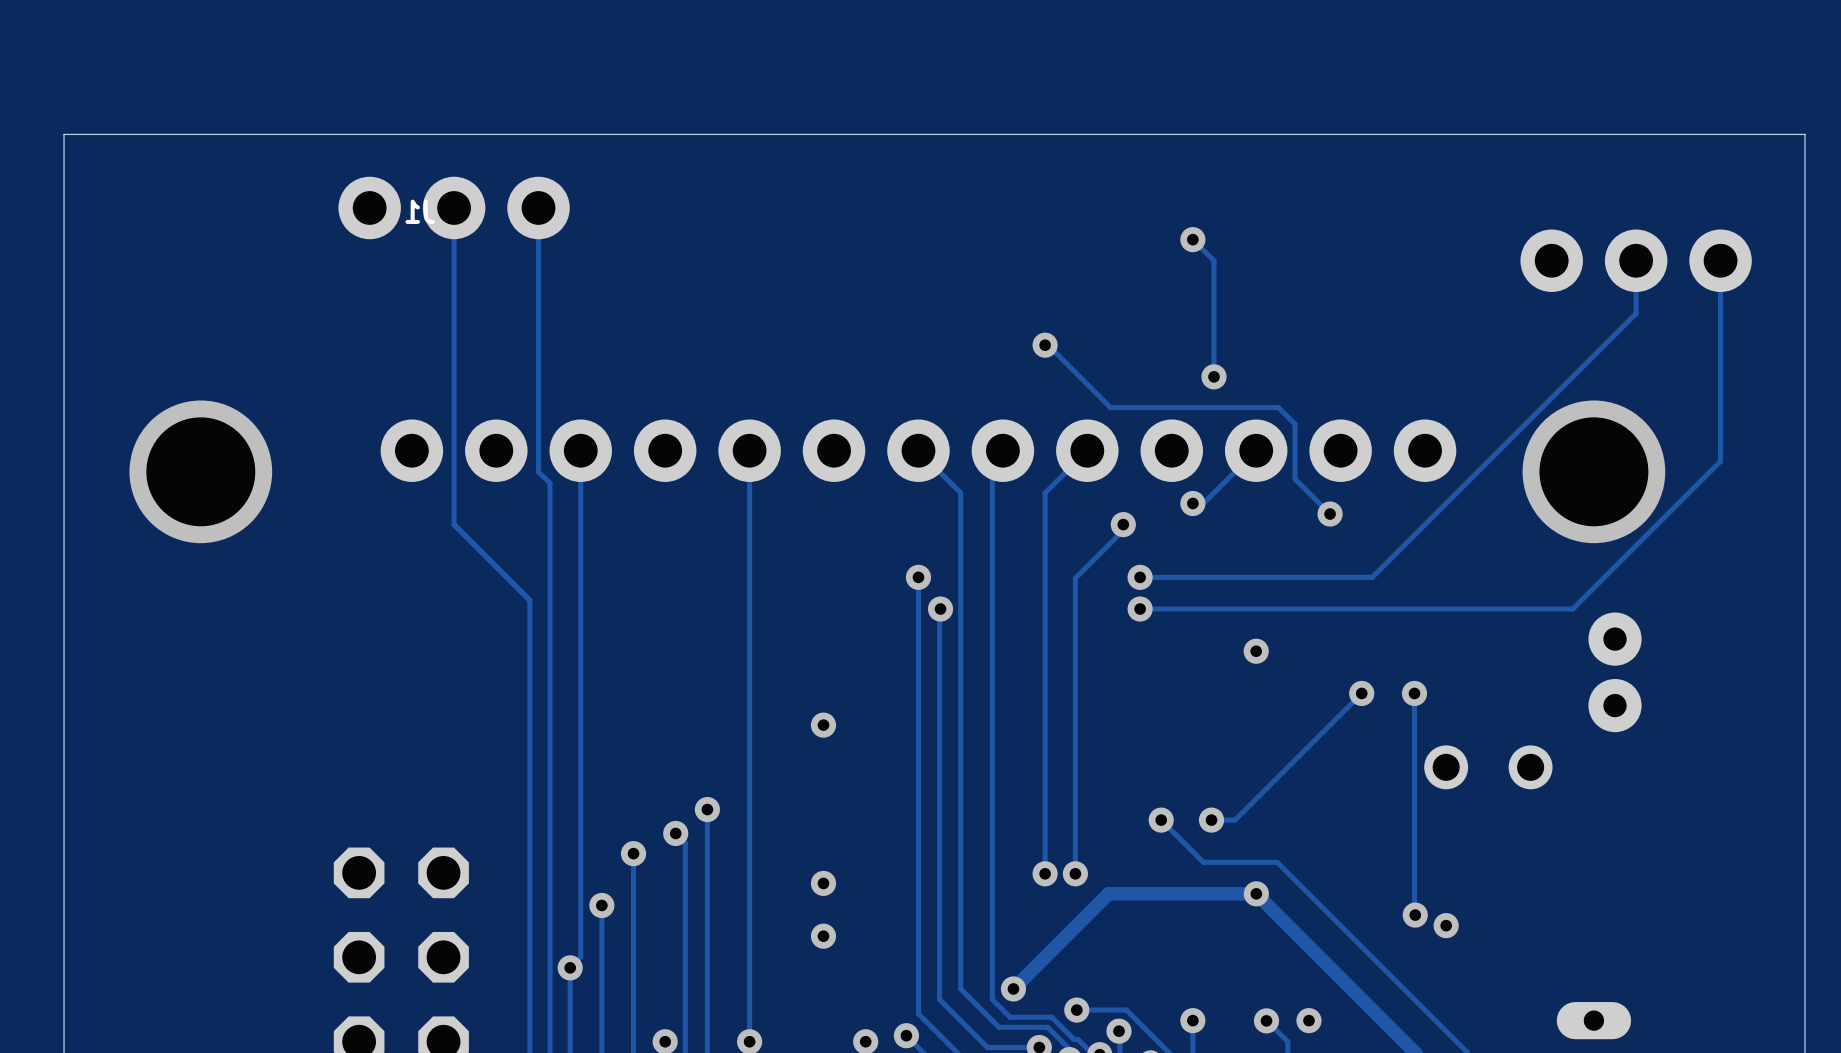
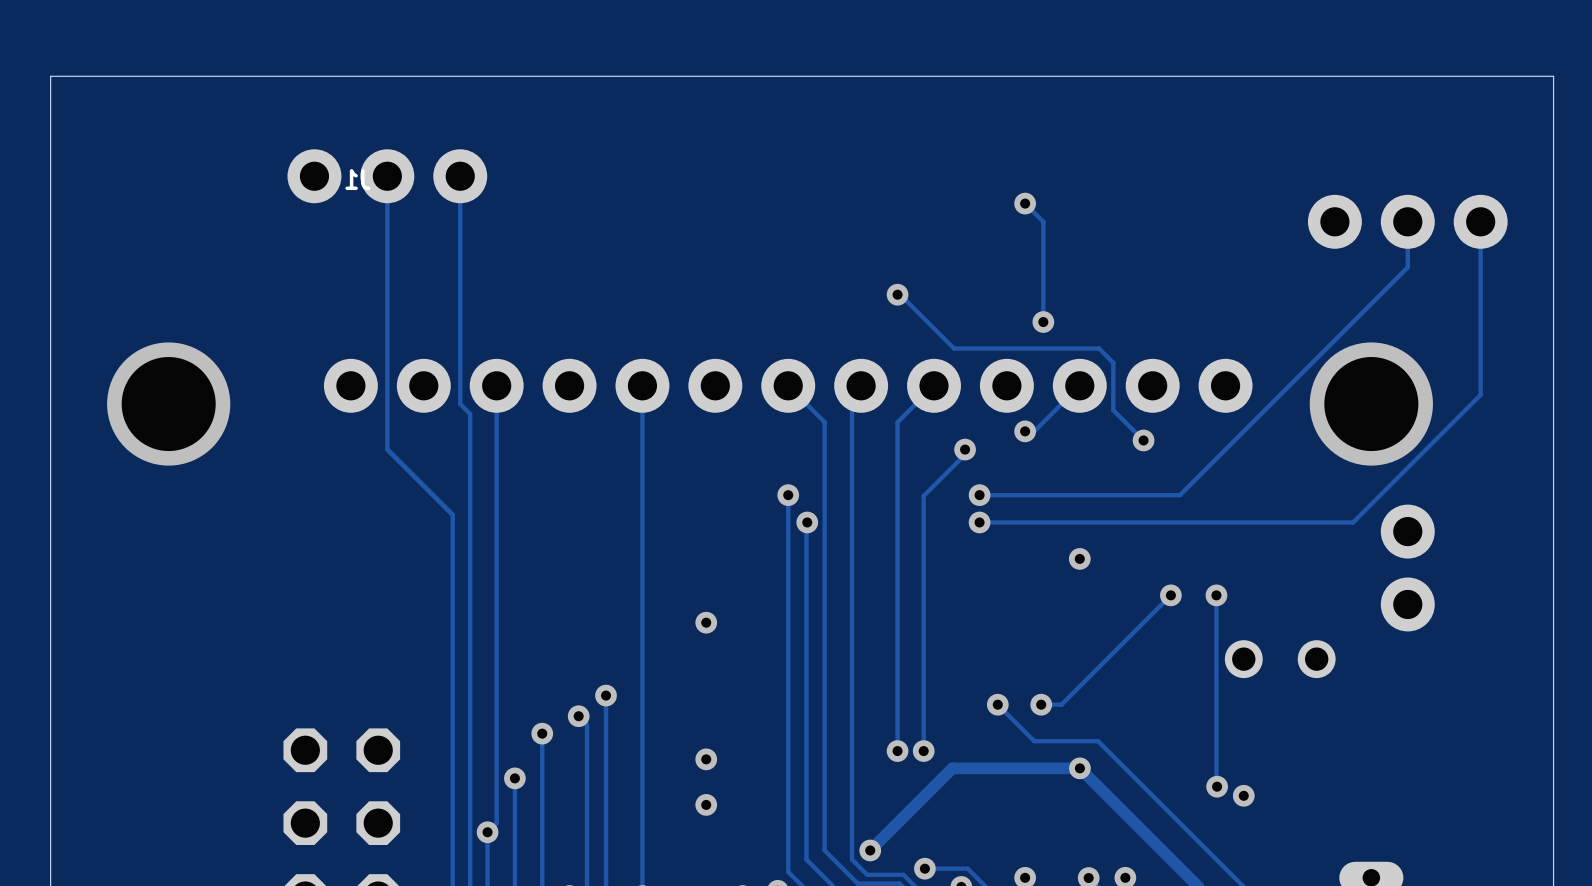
board edge: (1805, 134) (64, 134) -> (1553, 112) (1553, 76) (50, 76) (50, 112)
part footprint: [1588, 612, 1642, 733] -> [1380, 504, 1435, 632]

